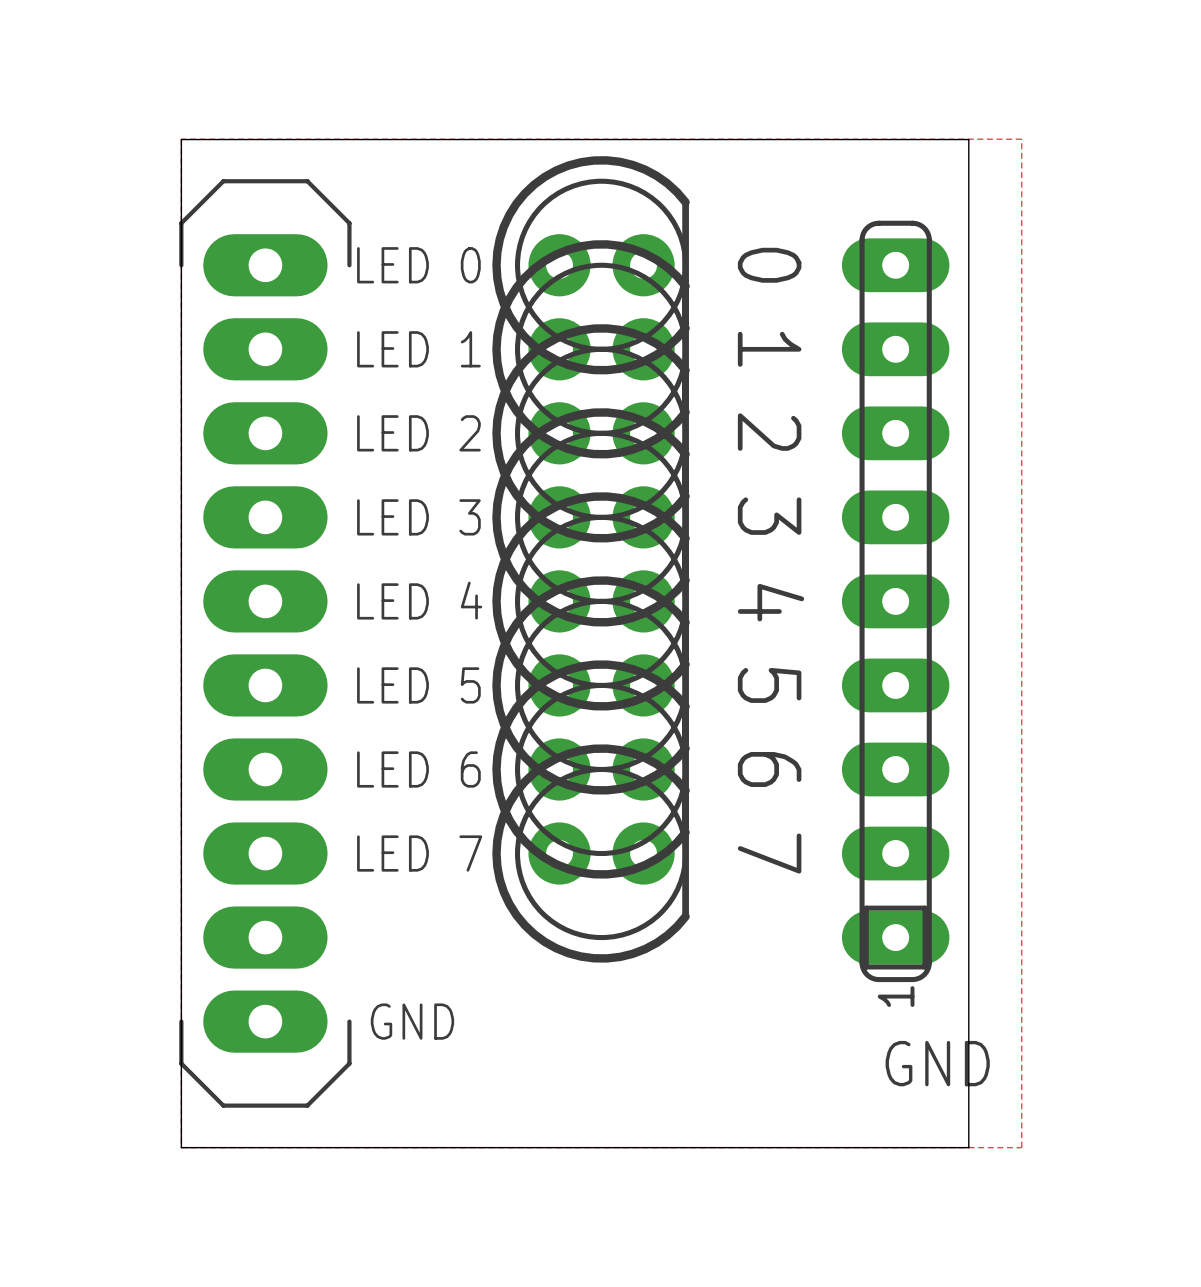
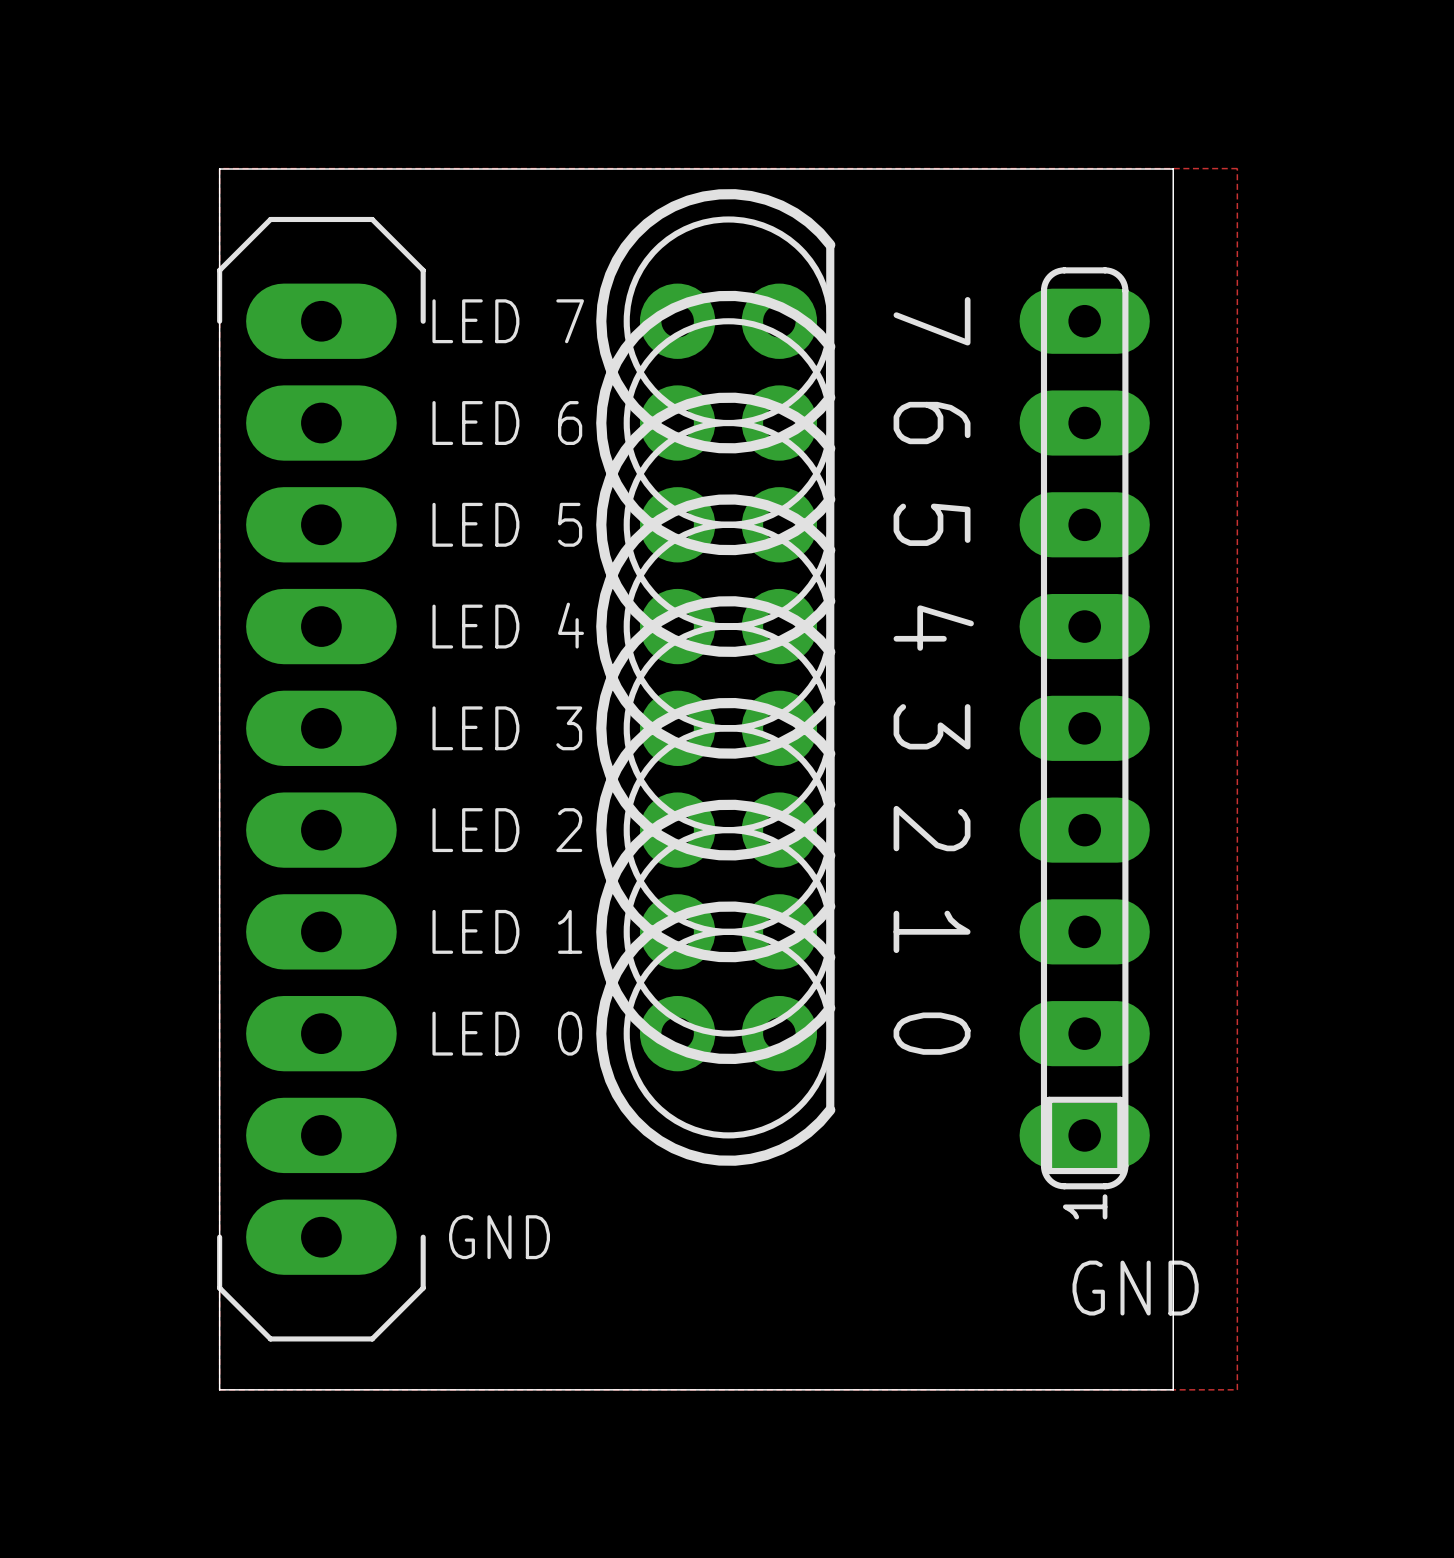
text: LED 0 (418, 265) -> LED 7 (508, 321)
text: 0 (769, 265) -> 7 (932, 321)
text: LED 1 (418, 349) -> LED 6 (507, 423)
text: 1 (769, 349) -> 6 (932, 423)
text: 2 (769, 432) -> 5 (932, 524)
text: LED 2 (418, 433) -> LED 5 (507, 524)
text: 3 (769, 516) -> 4 (933, 628)
text: LED 3 (418, 517) -> LED 4 (508, 625)
text: LED 4 (419, 600) -> LED 3 (507, 728)
text: 4 (771, 602) -> 3 (932, 726)
text: LED 5 (418, 685) -> LED 2 (507, 830)
text: 5 (769, 685) -> 2 (932, 828)
text: LED 6 (418, 769) -> LED 1 (507, 931)
text: 6 (769, 769) -> 1 (932, 931)
text: LED 7 (419, 853) -> LED 0 (507, 1033)
text: 7 (769, 853) -> 0 (932, 1033)

